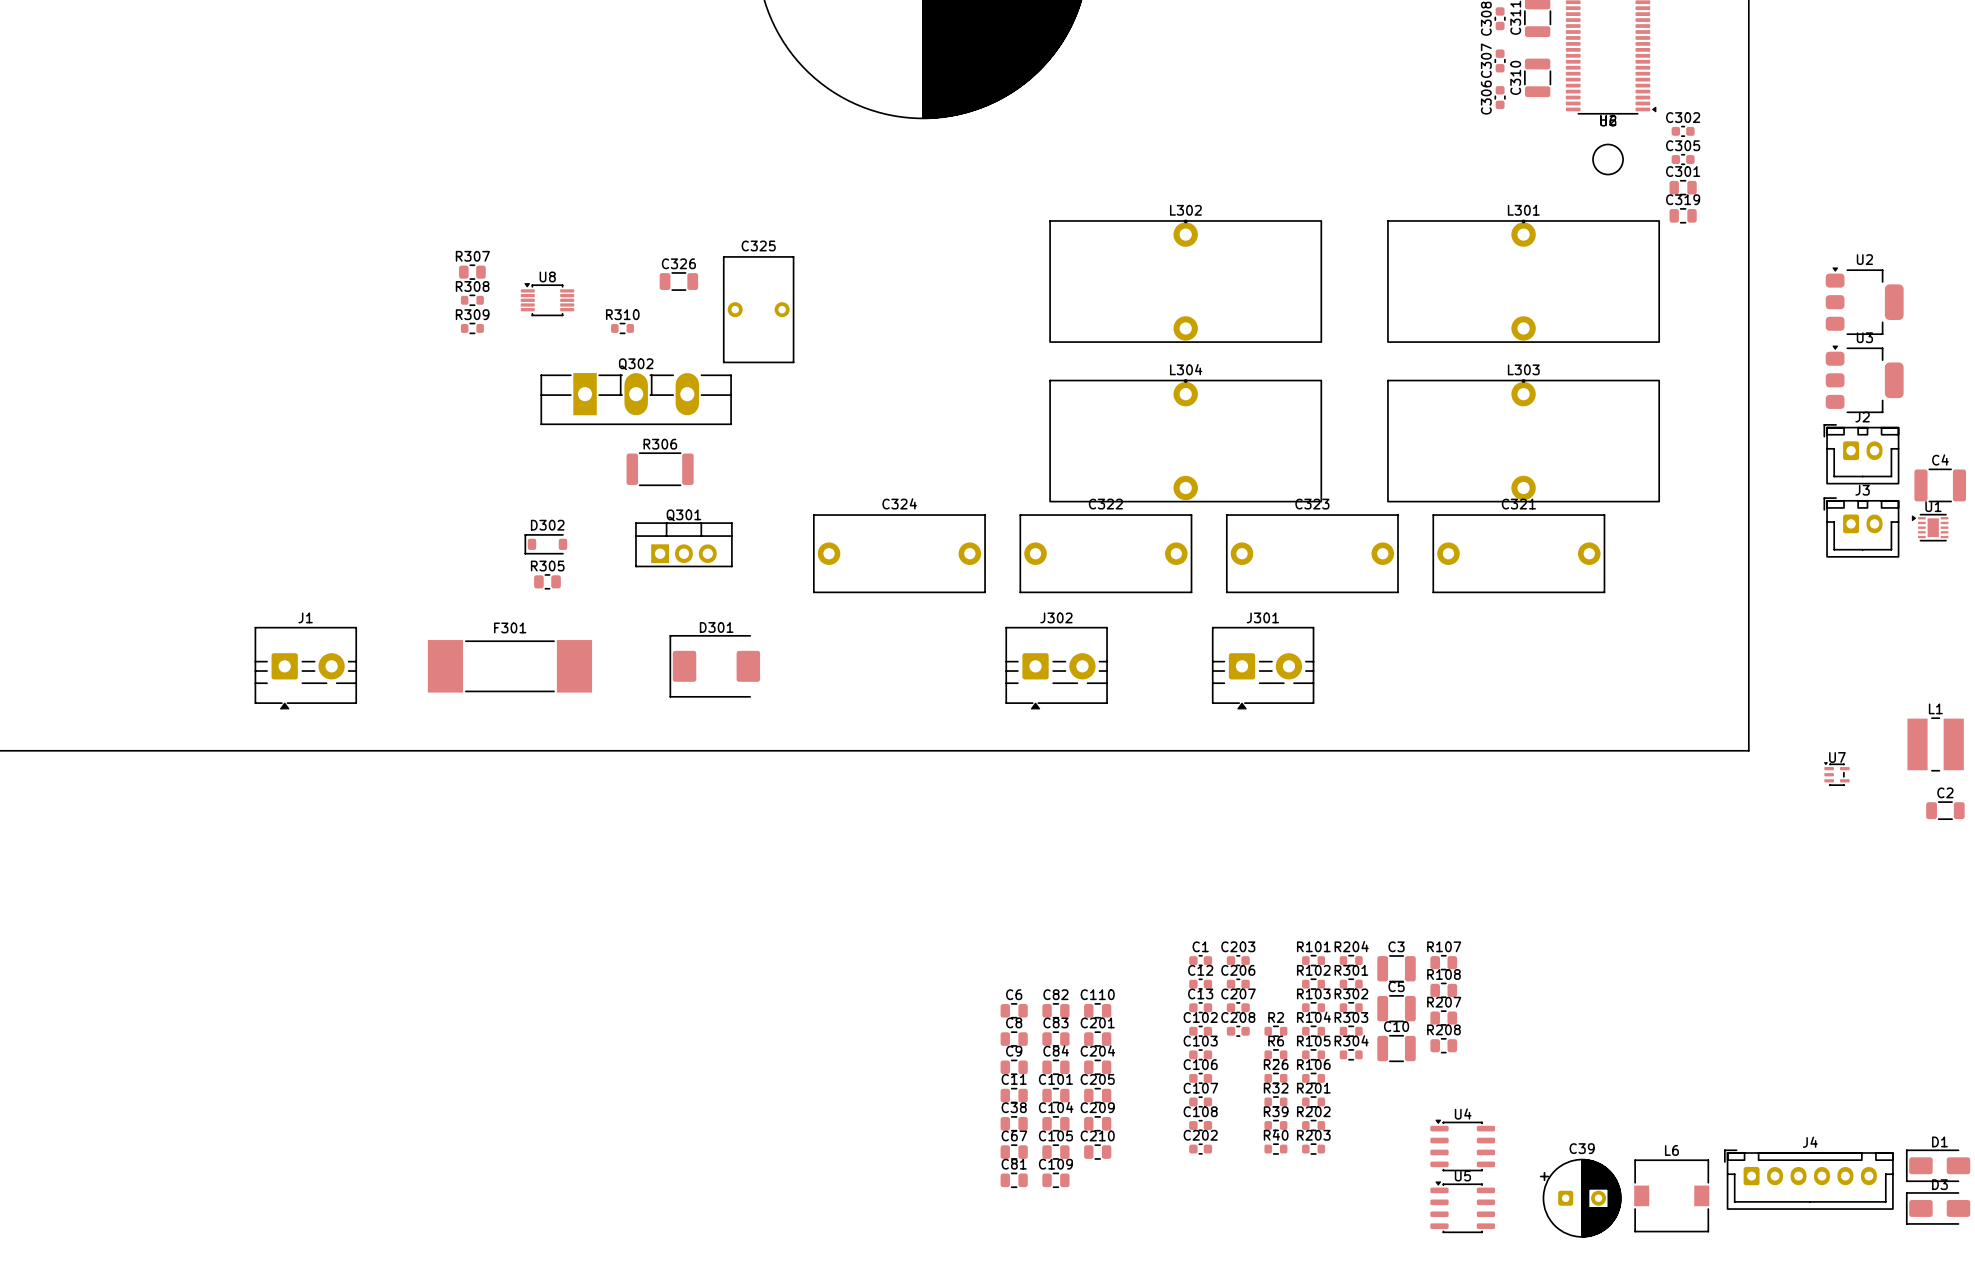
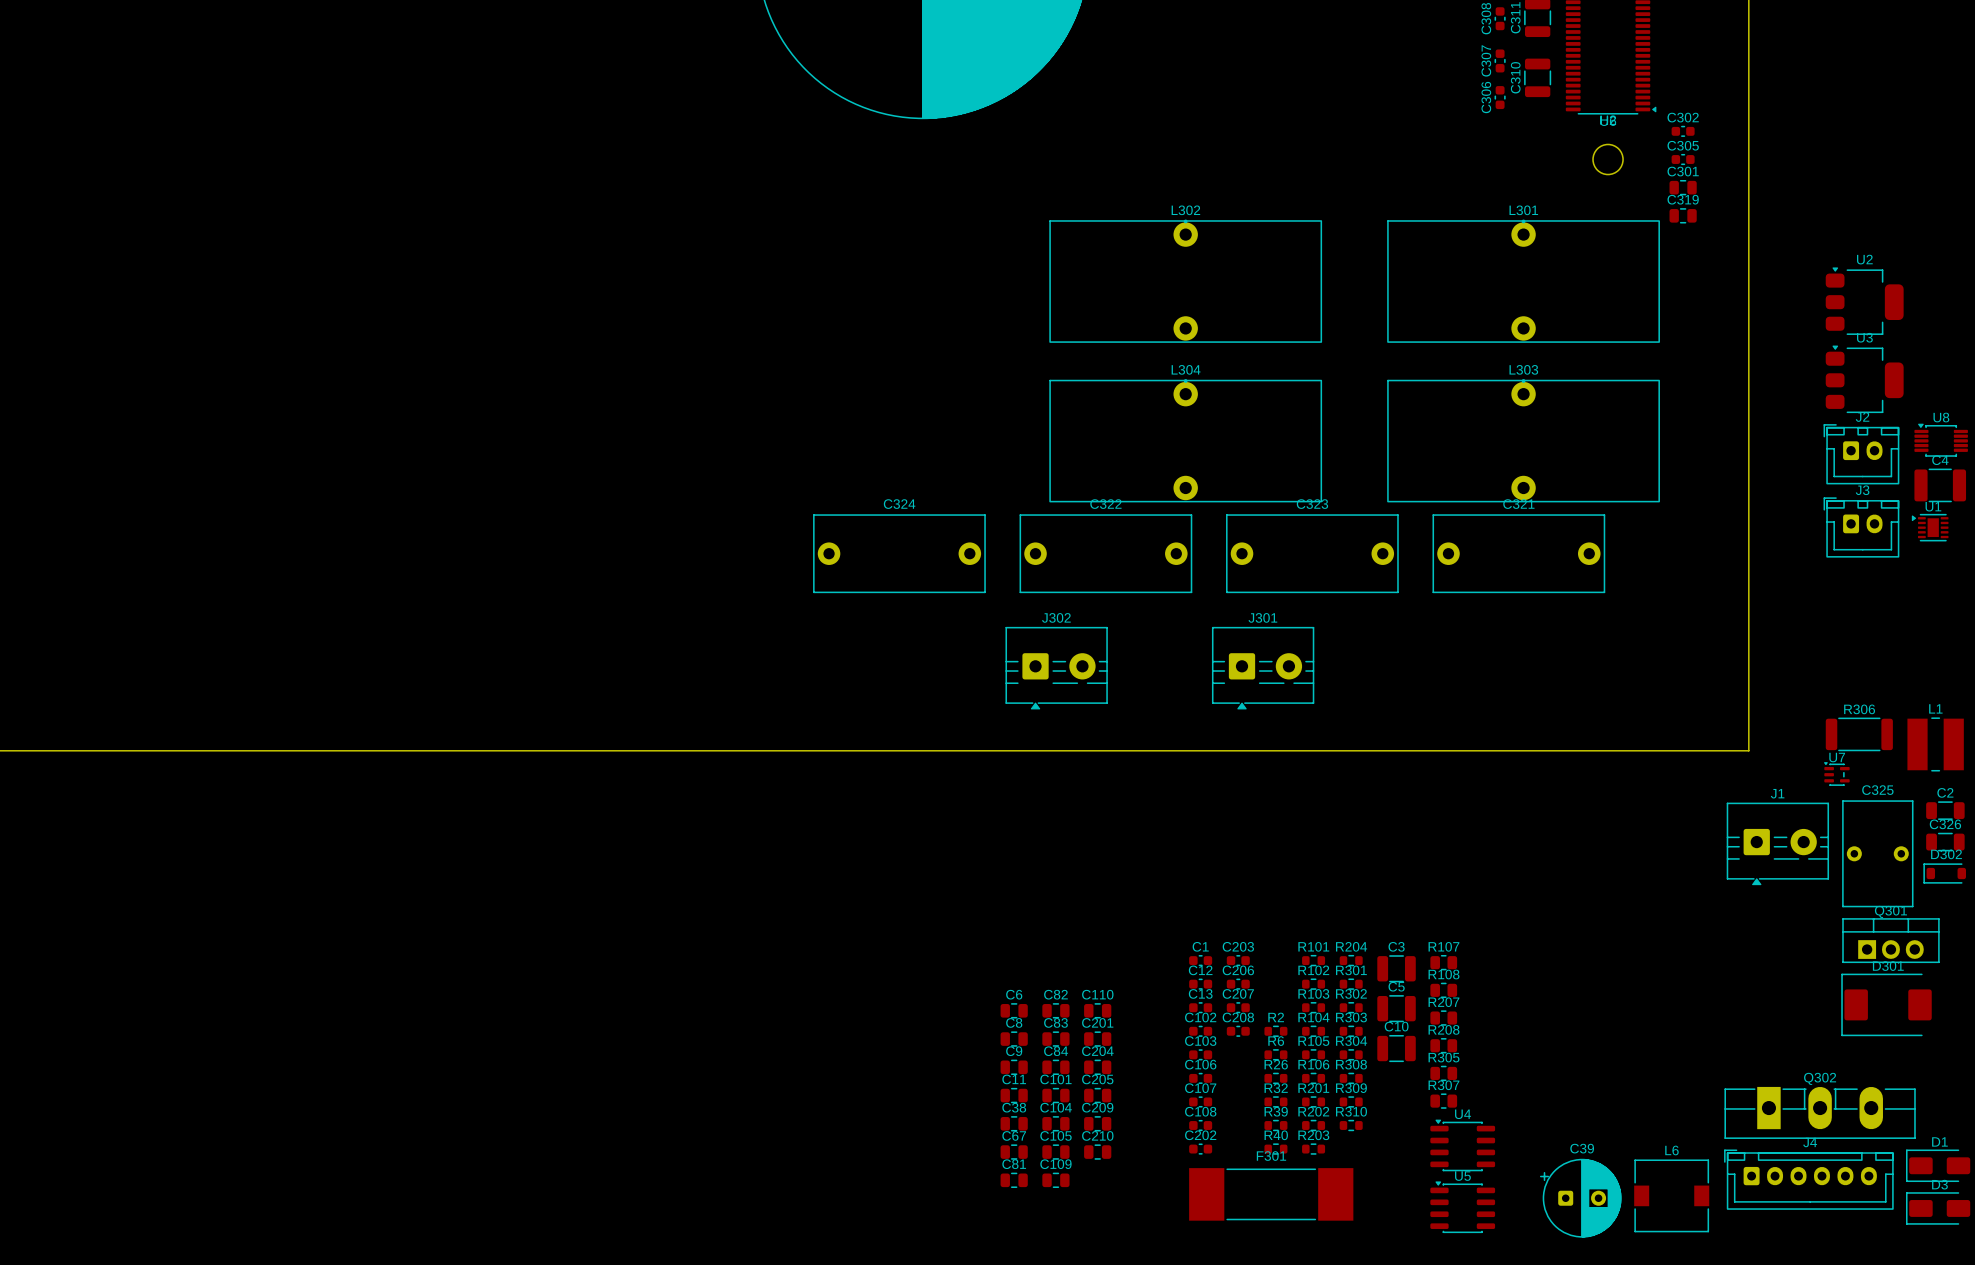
R307 position: (472, 272) -> (1443, 1101)
C326 position: (678, 281) -> (1945, 842)
U8 position: (547, 299) -> (1941, 440)
R308 position: (472, 300) -> (1351, 1078)
C325 position: (758, 309) -> (1877, 853)
R309 position: (472, 328) -> (1351, 1101)
R310 position: (622, 328) -> (1351, 1125)
Q302 position: (636, 398) -> (1820, 1112)
R306 position: (660, 469) -> (1859, 734)
D302 position: (545, 544) -> (1944, 873)
Q301 position: (683, 544) -> (1890, 940)
R305 position: (547, 581) -> (1443, 1073)
F301 position: (509, 666) -> (1271, 1194)
D301 position: (714, 666) -> (1886, 1004)
J1 position: (305, 668) -> (1777, 843)

